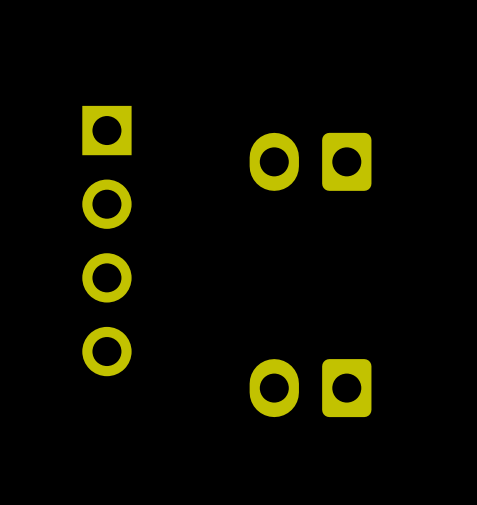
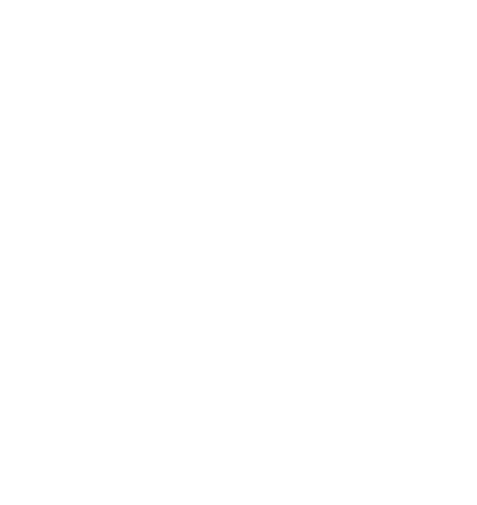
part: (310, 161) -> none
part: (106, 241) -> none
part: (310, 388) -> none

